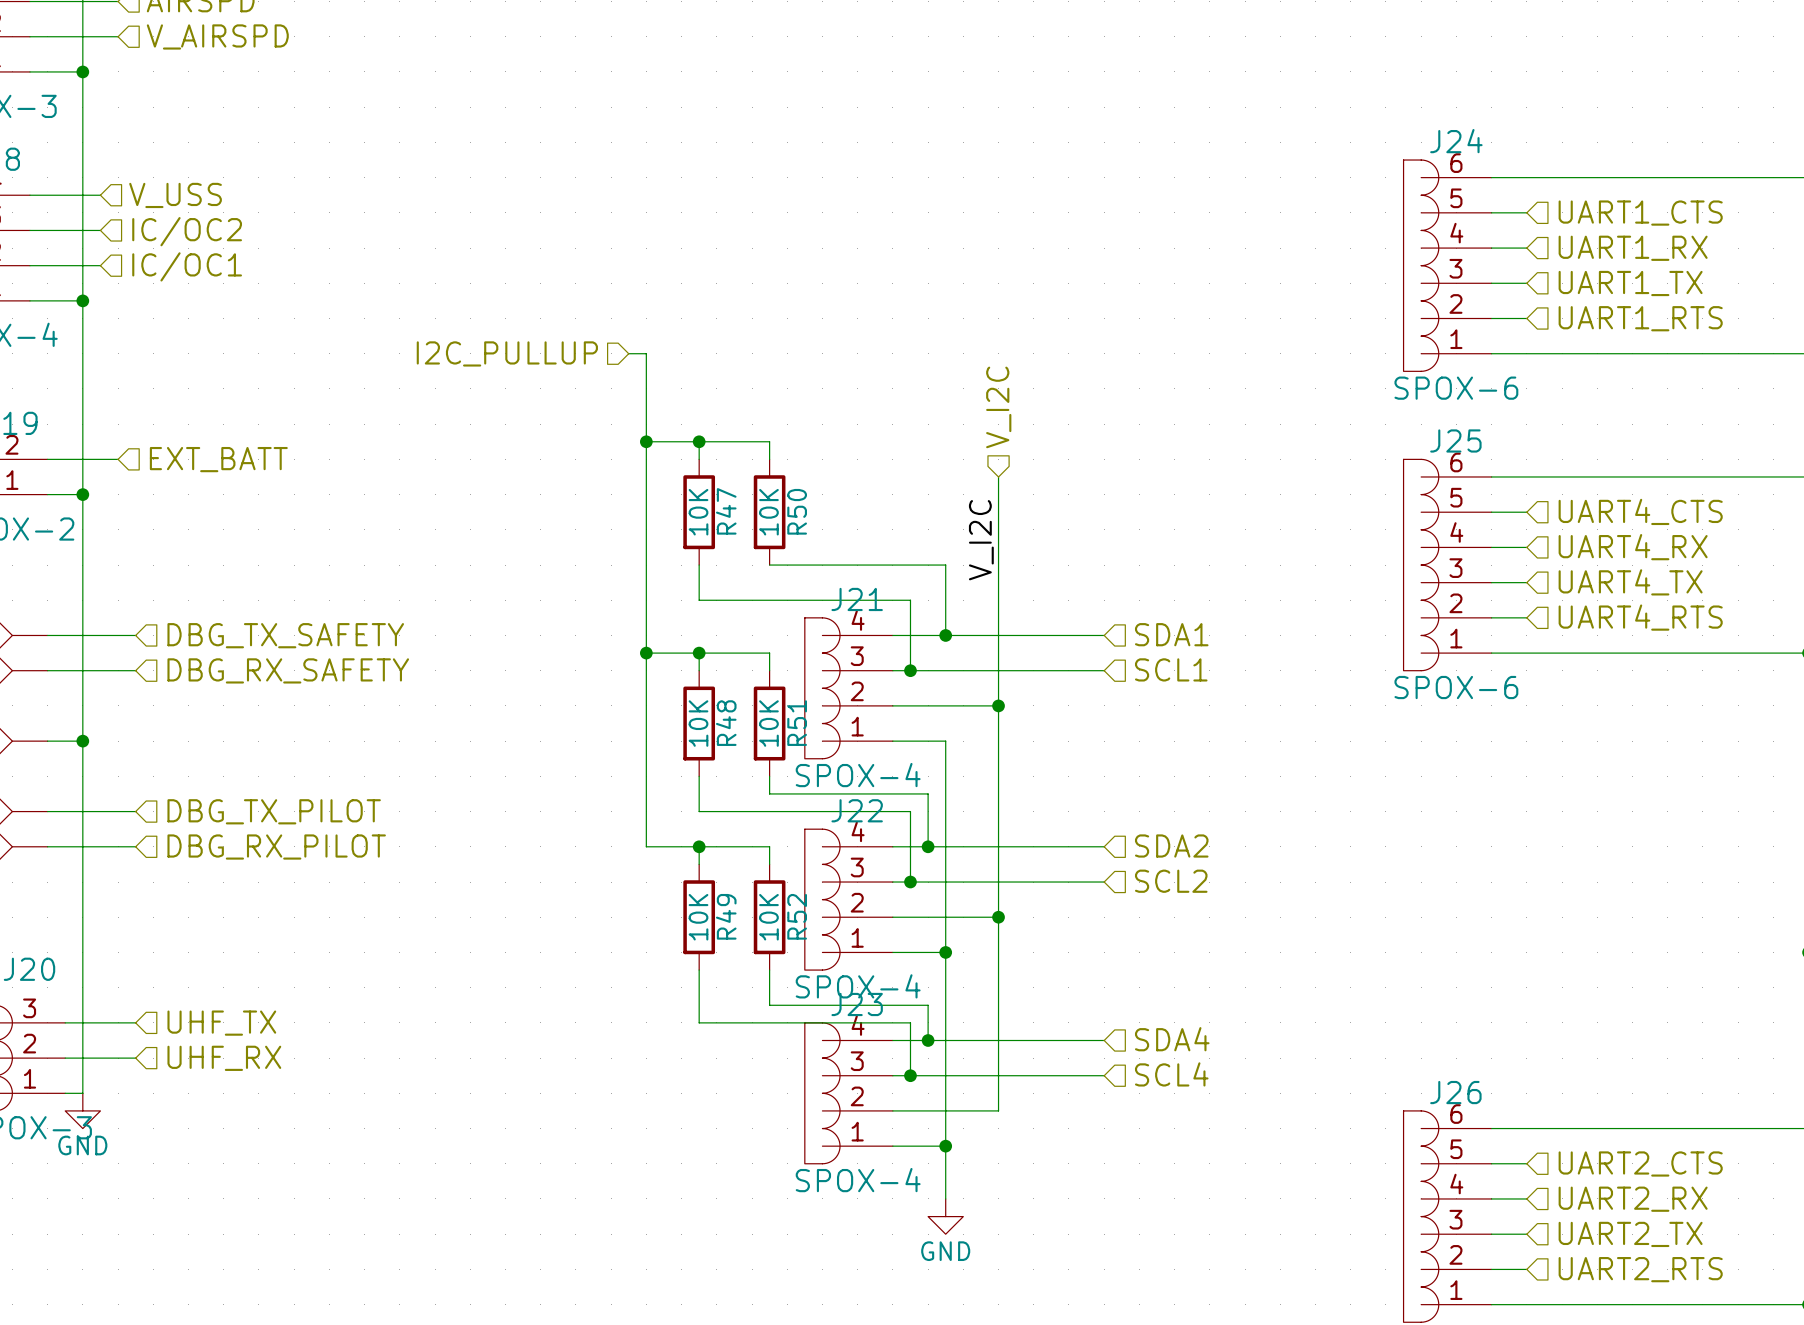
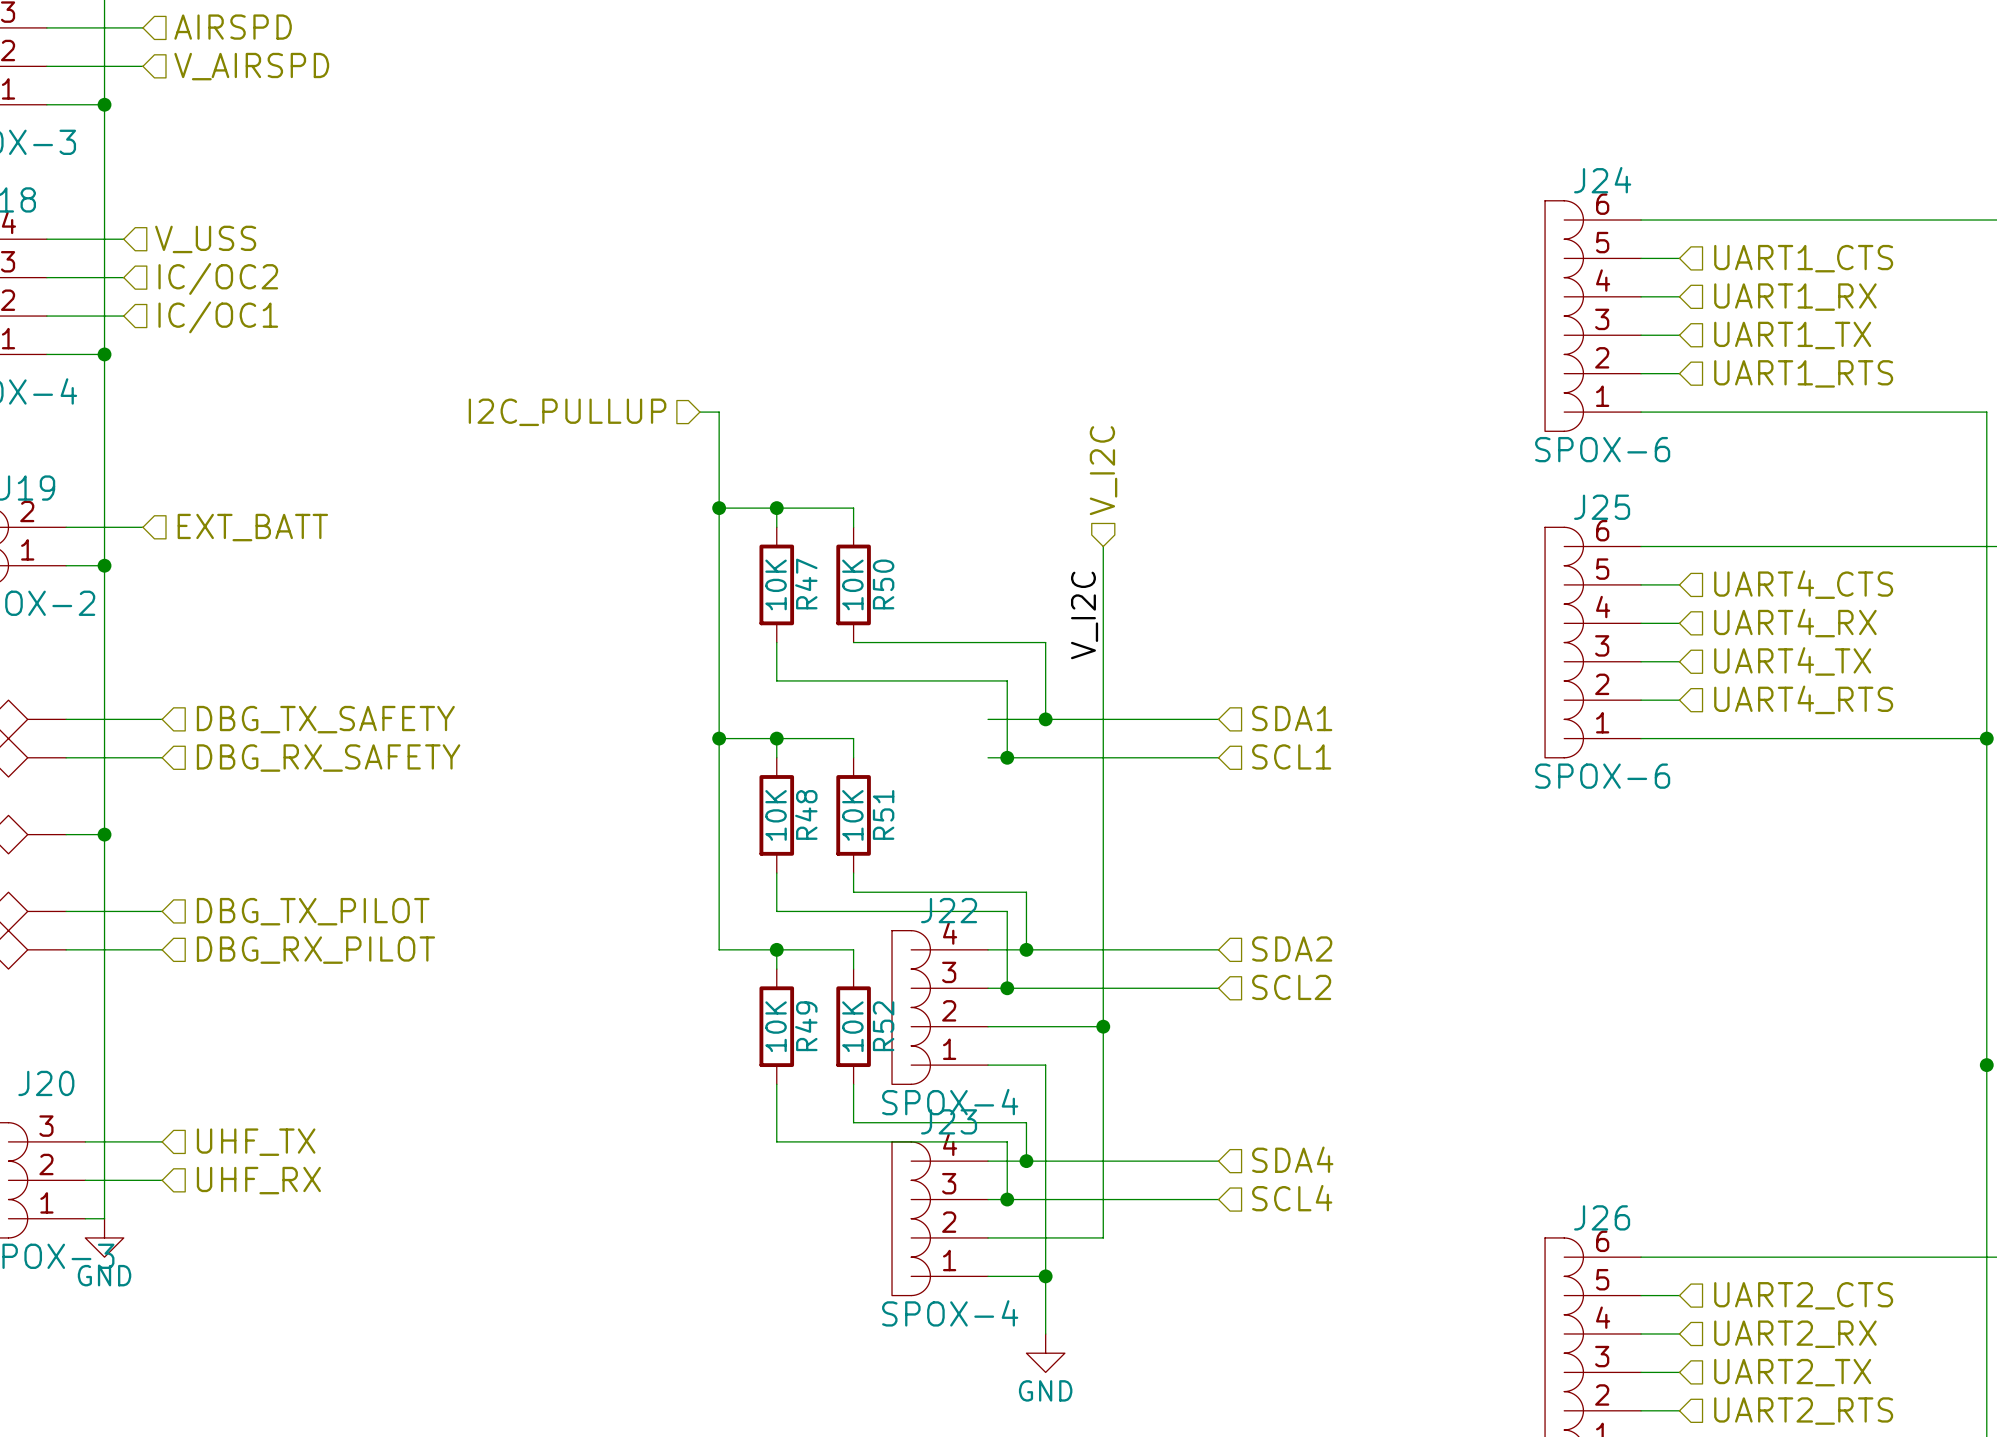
J21: SPOX-4 (848, 688) -> none
wire: (892, 705) (998, 705) -> none
junction: (998, 705) -> none
wire: (892, 741) (945, 741) (945, 952) -> none
junction: (945, 952) -> none

